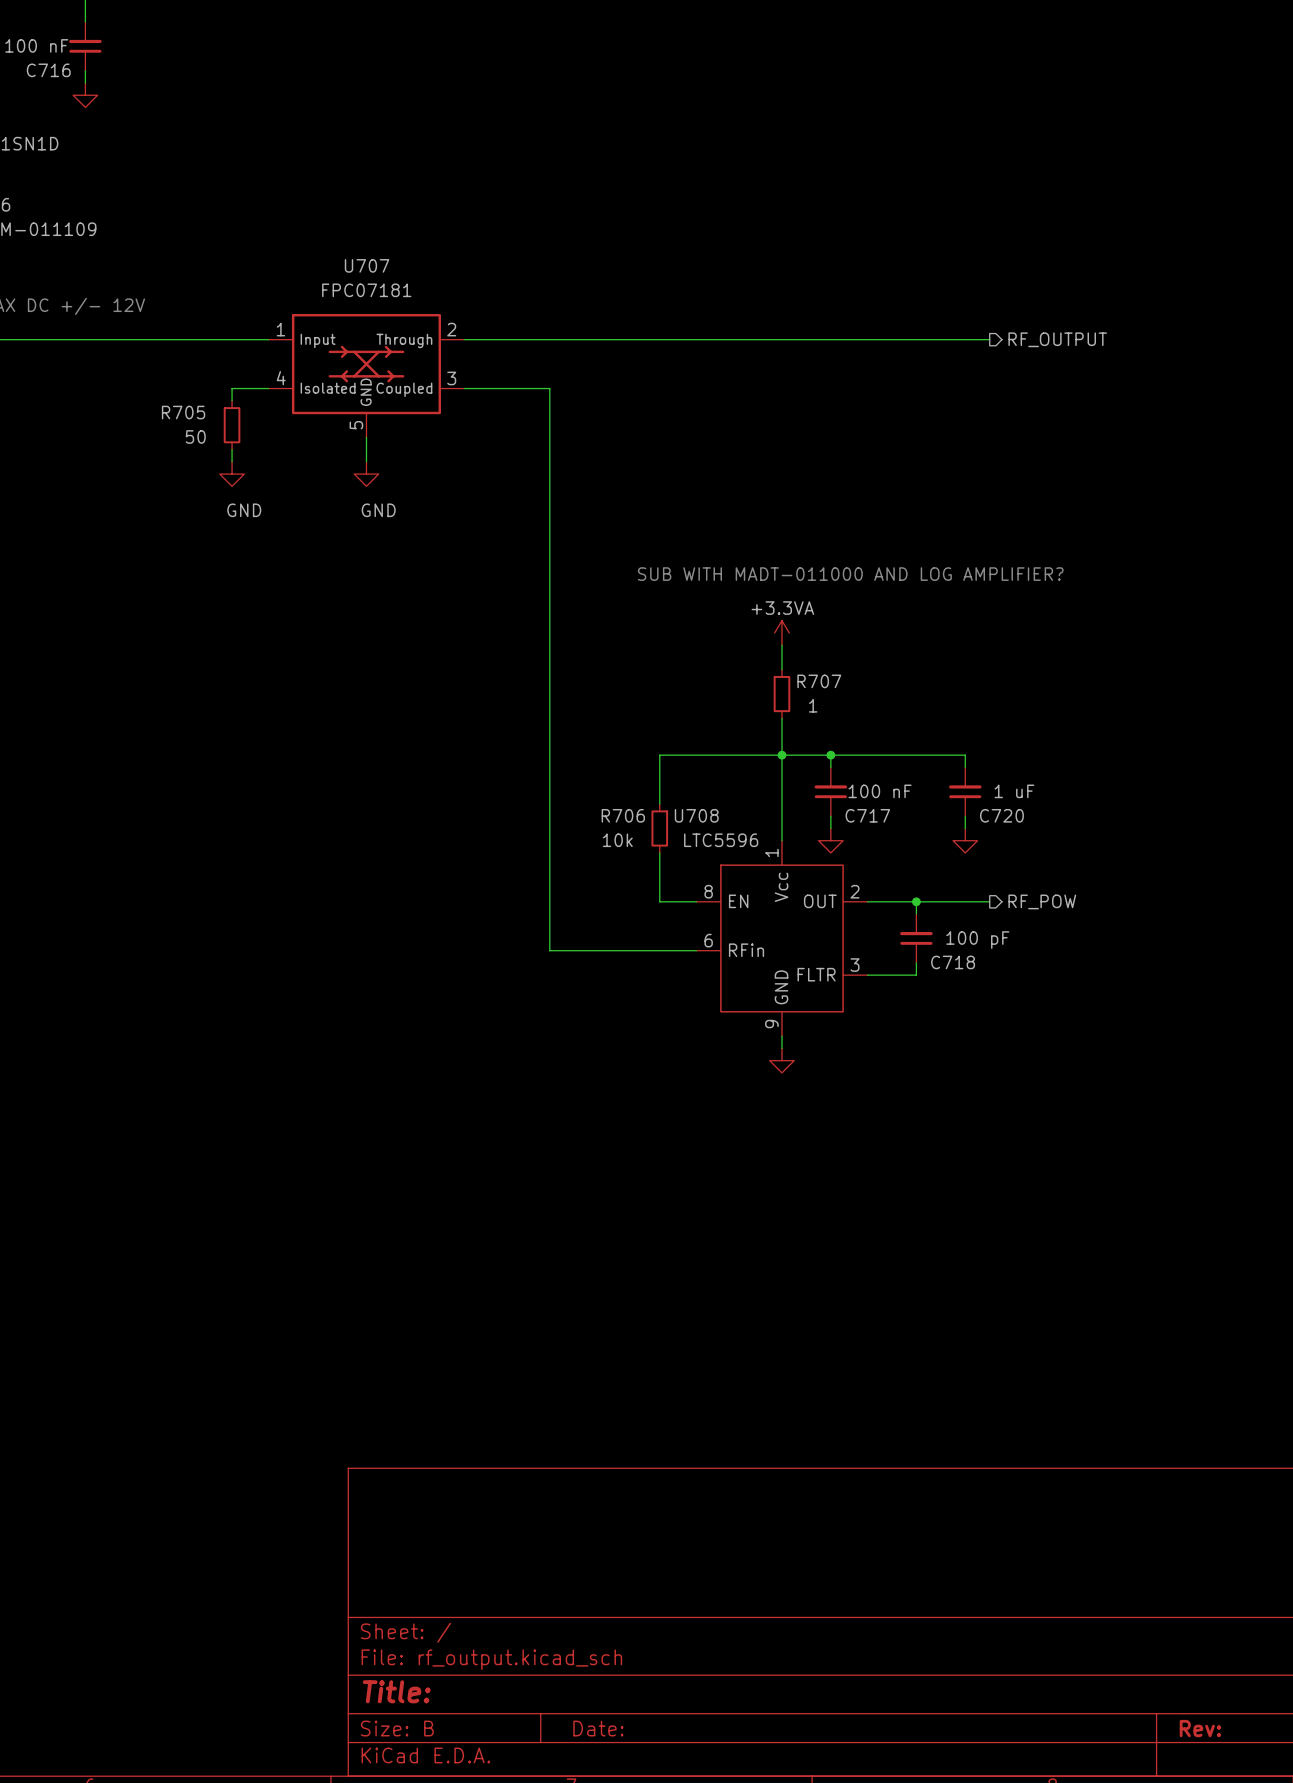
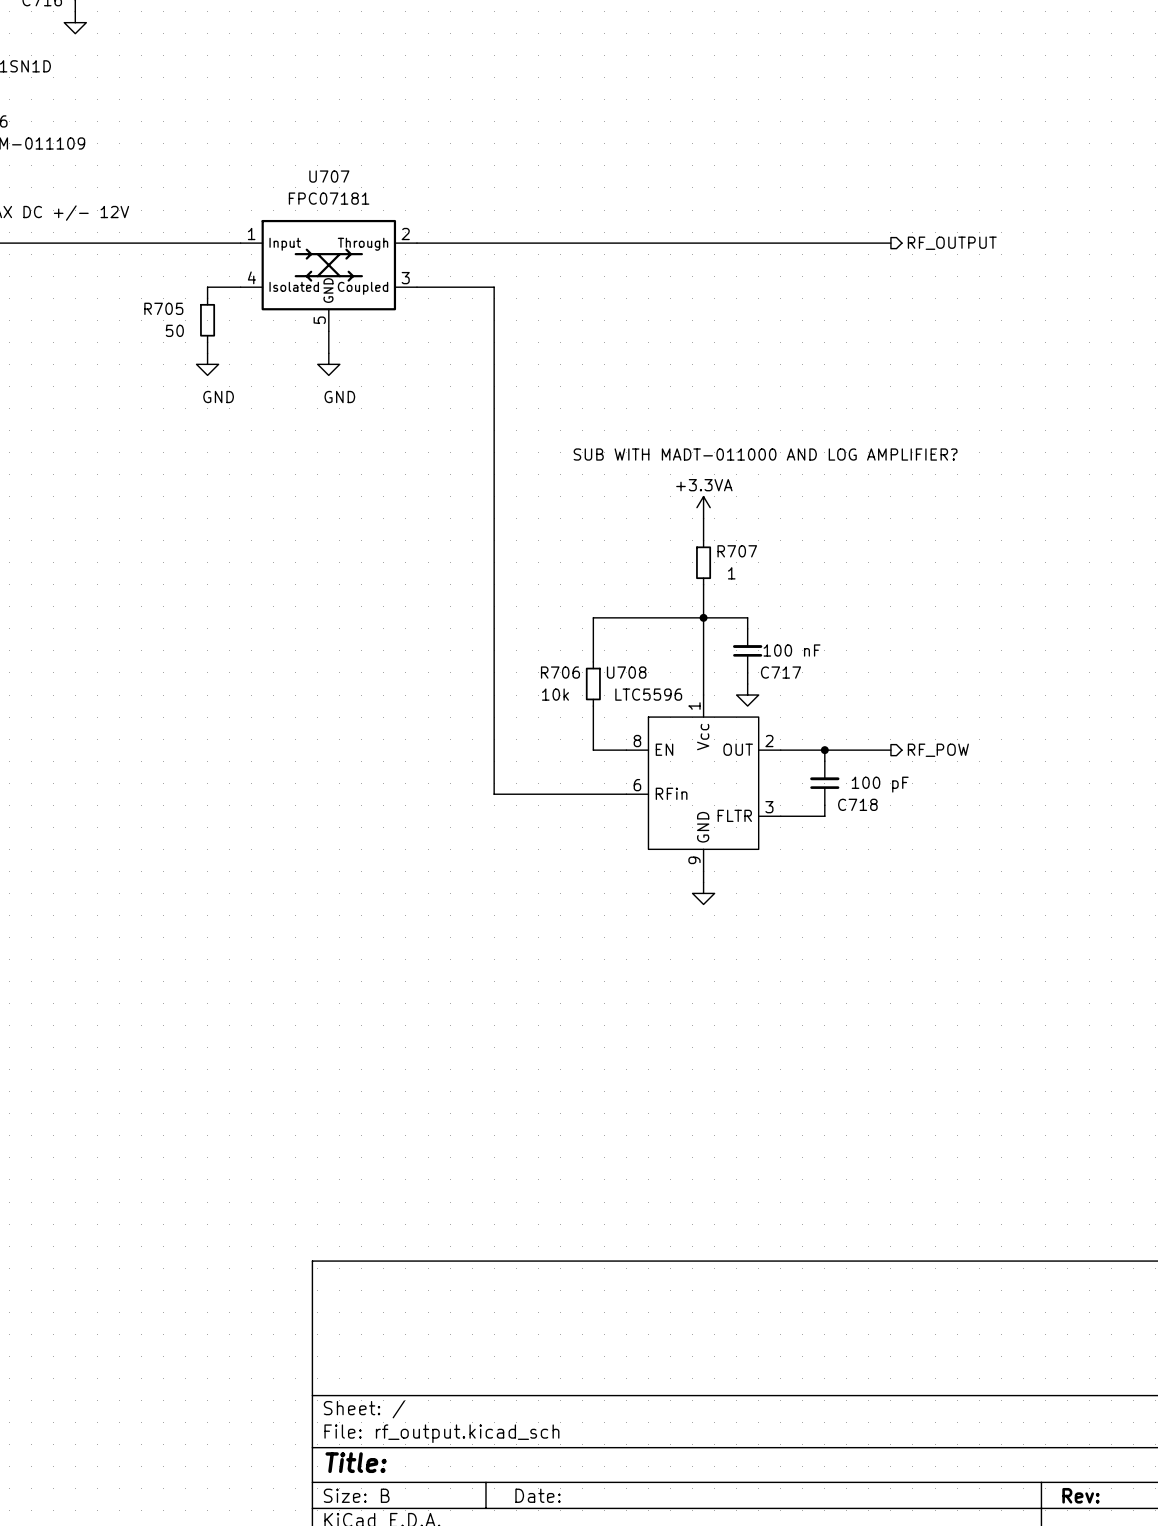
wire: (830, 755) (965, 755) (965, 767) -> none
junction: (830, 755) -> none
C720: 1 uF (965, 791) -> none
wire: (965, 816) (965, 828) -> none
power symbol: (965, 840) -> none

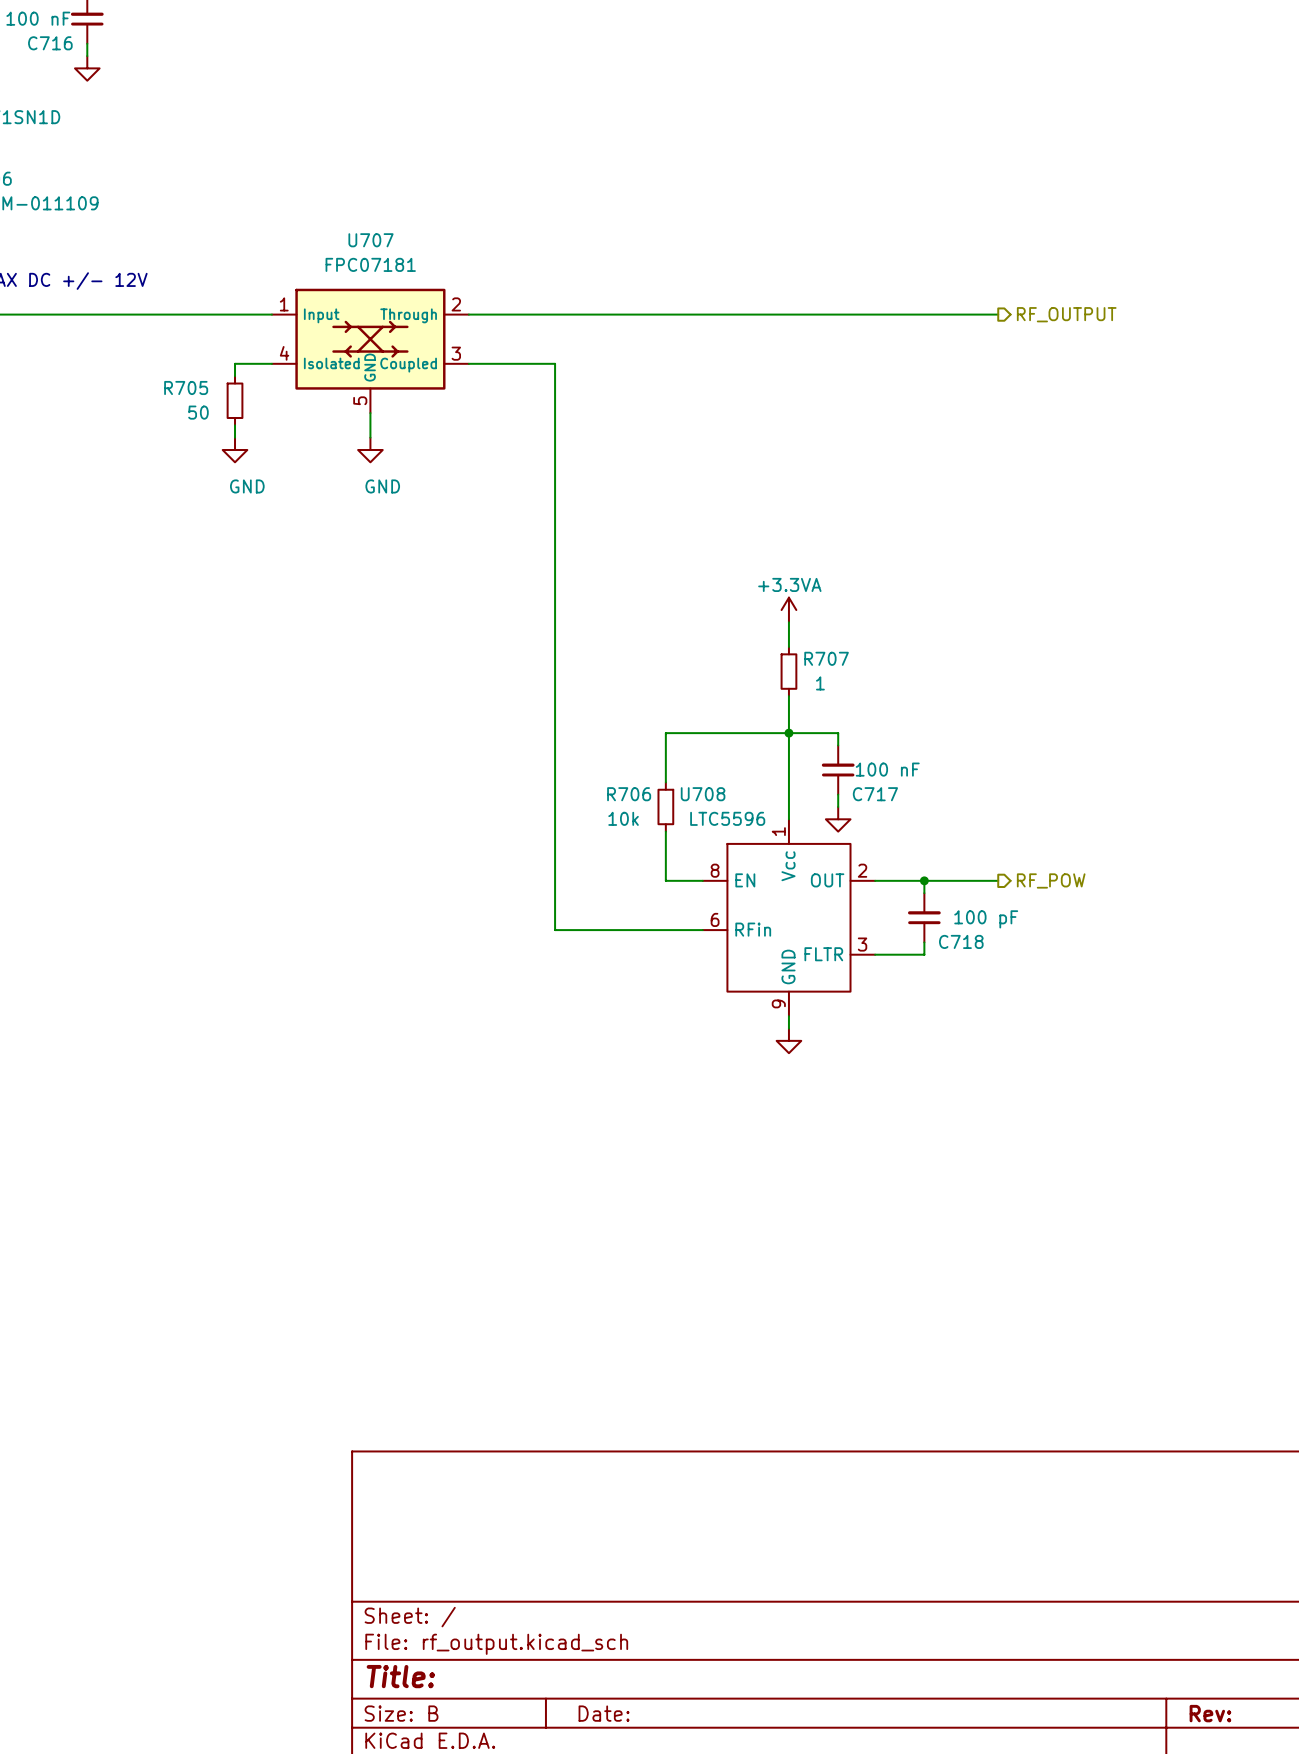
text: SUB WITH MADT-011000 AND LOG AMPLIFIER? (765, 454) -> none

